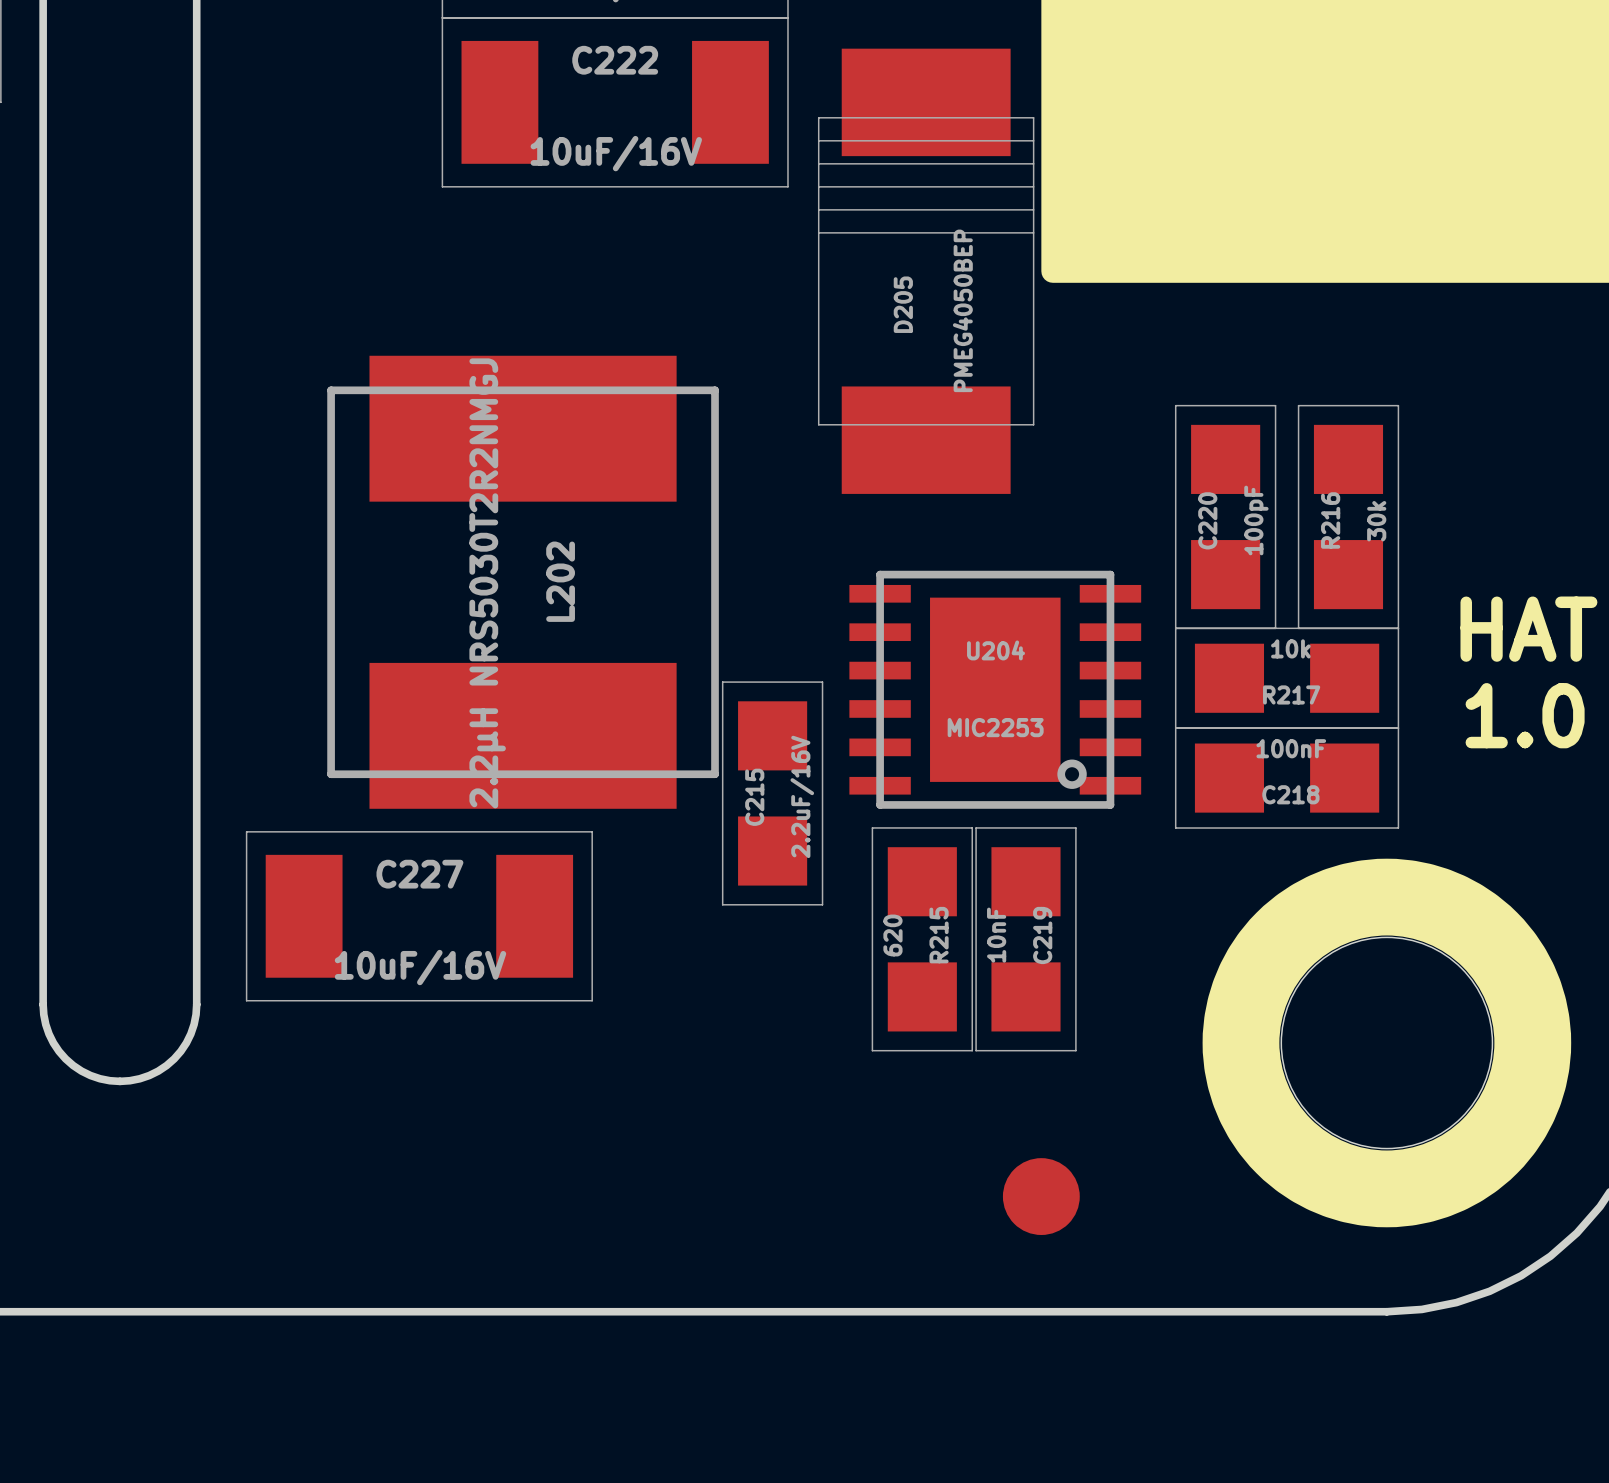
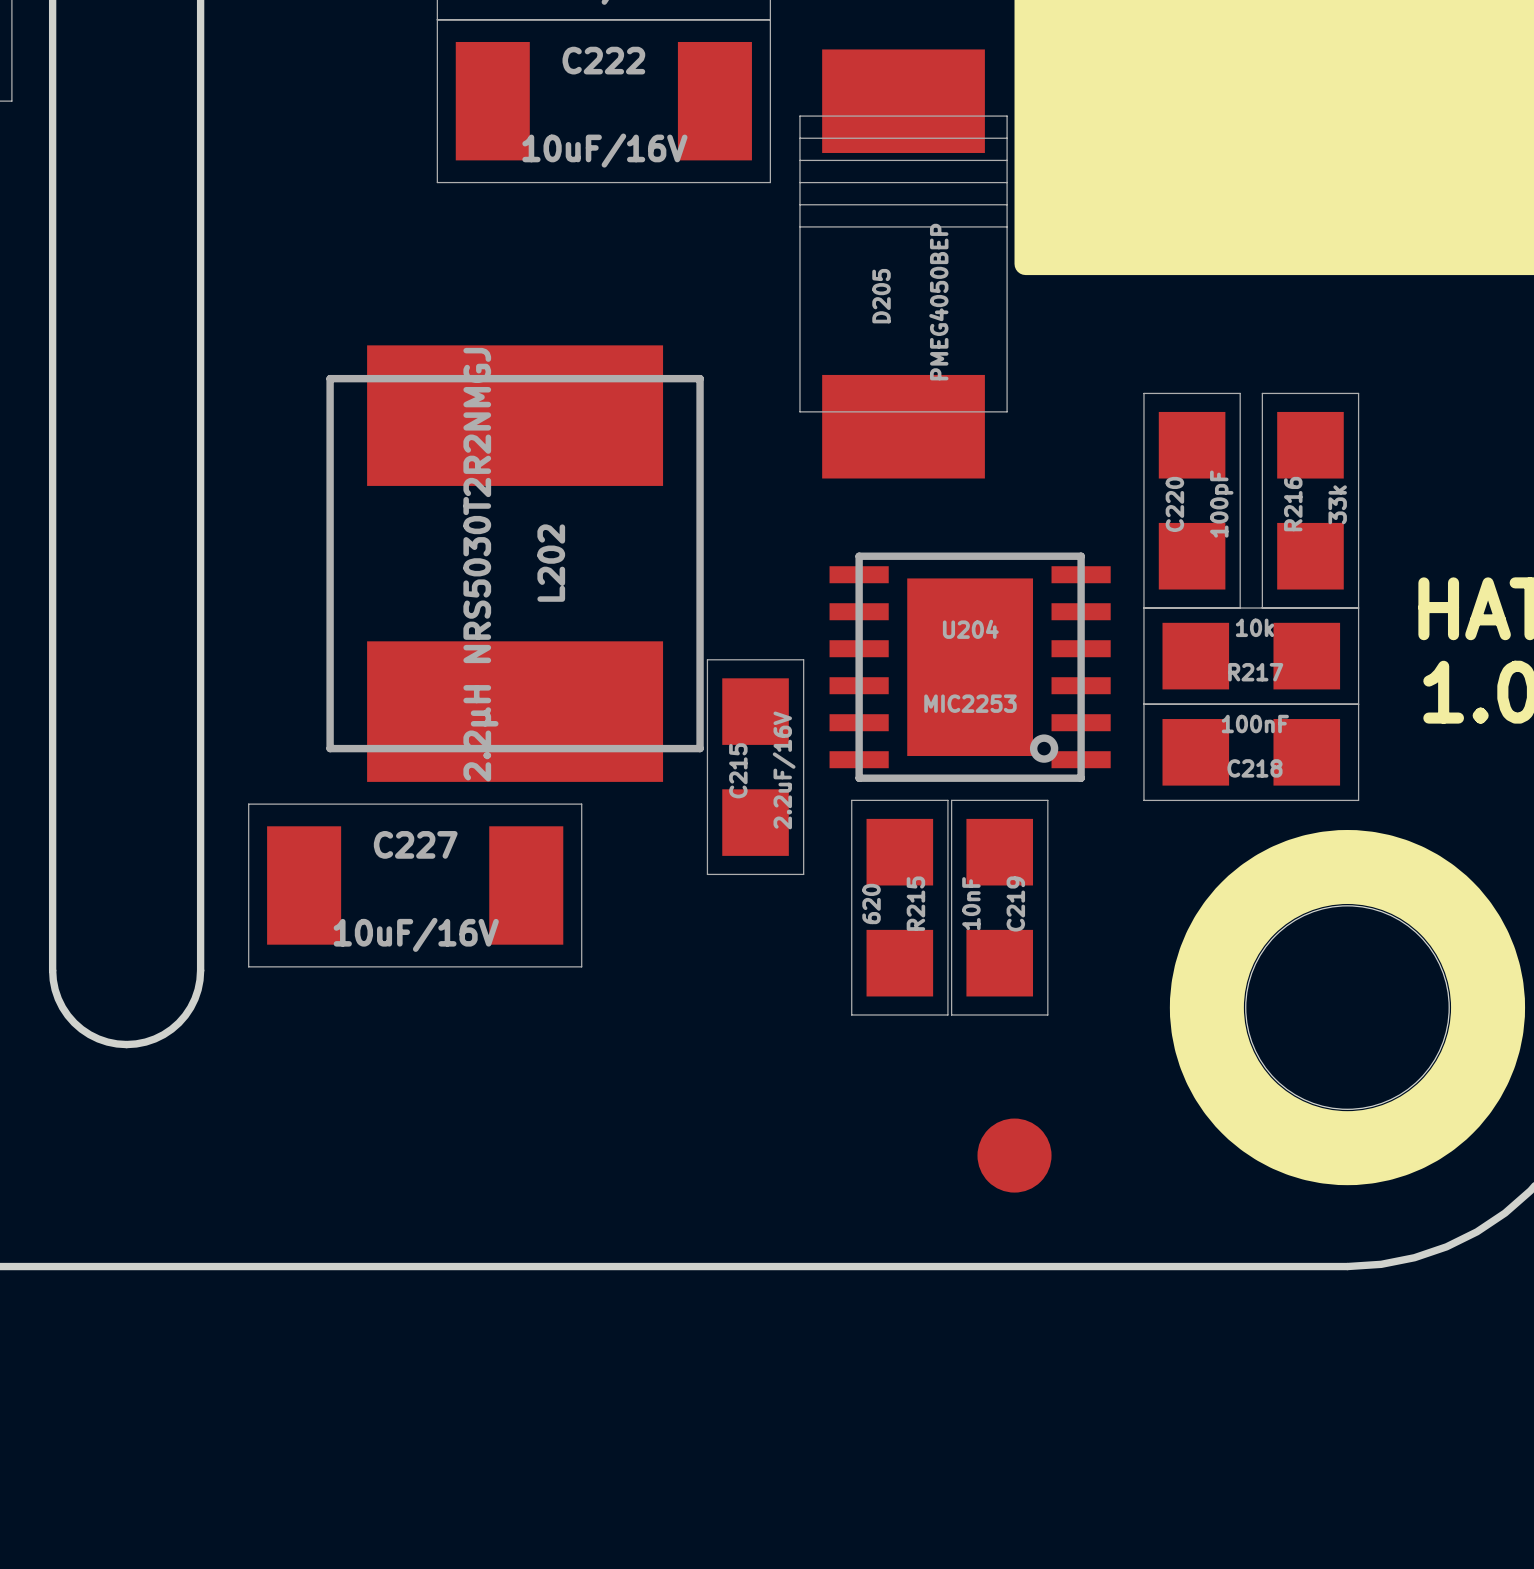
R216 value: 30k (1376, 521) -> 33k (1337, 504)

